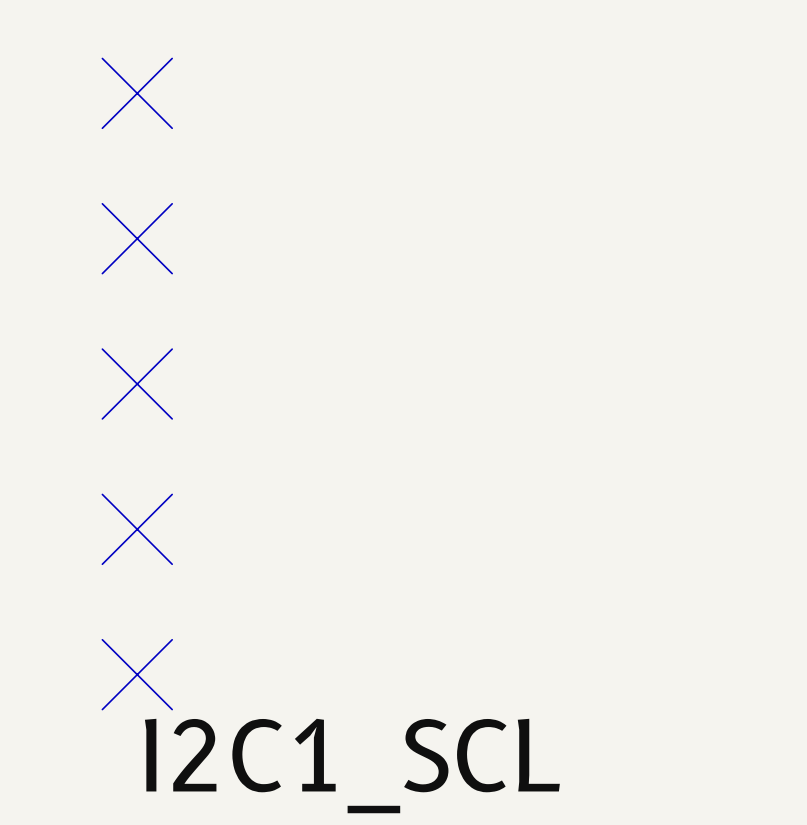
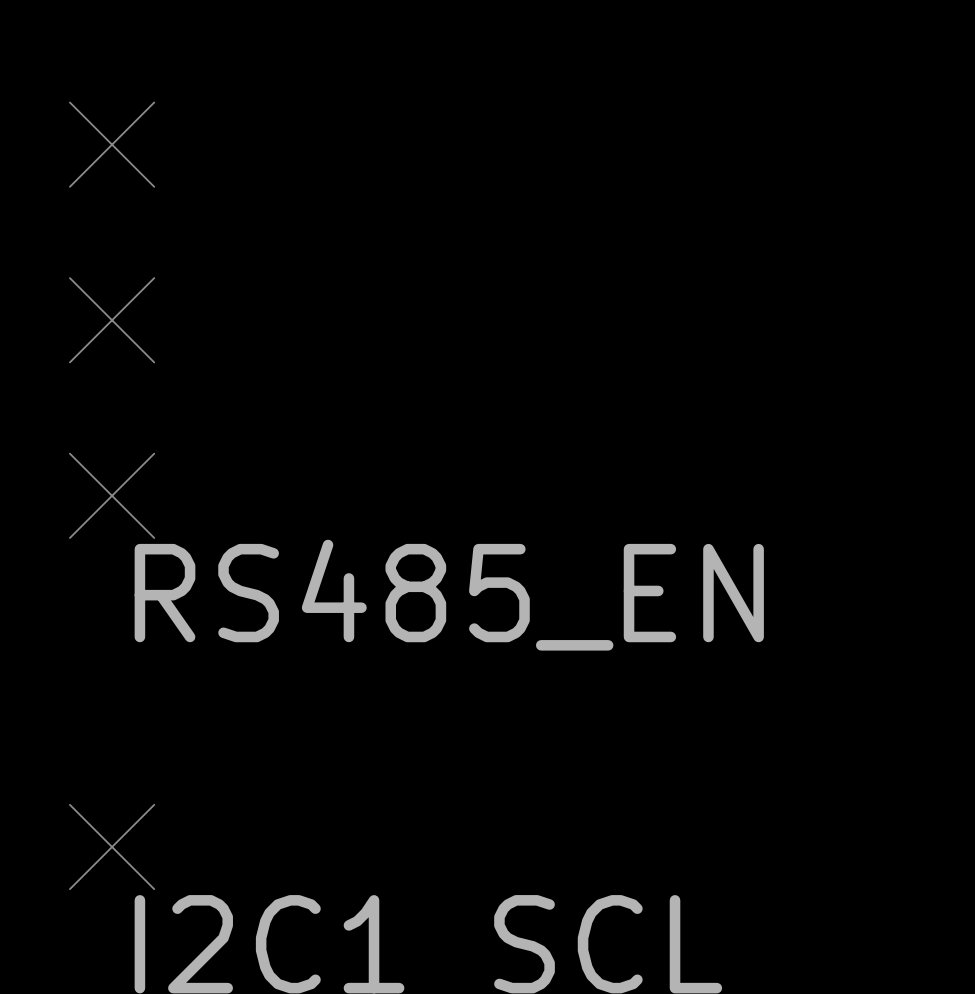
label: none -> RS485_EN (449, 595)
no-connect mark: (137, 529) -> none

